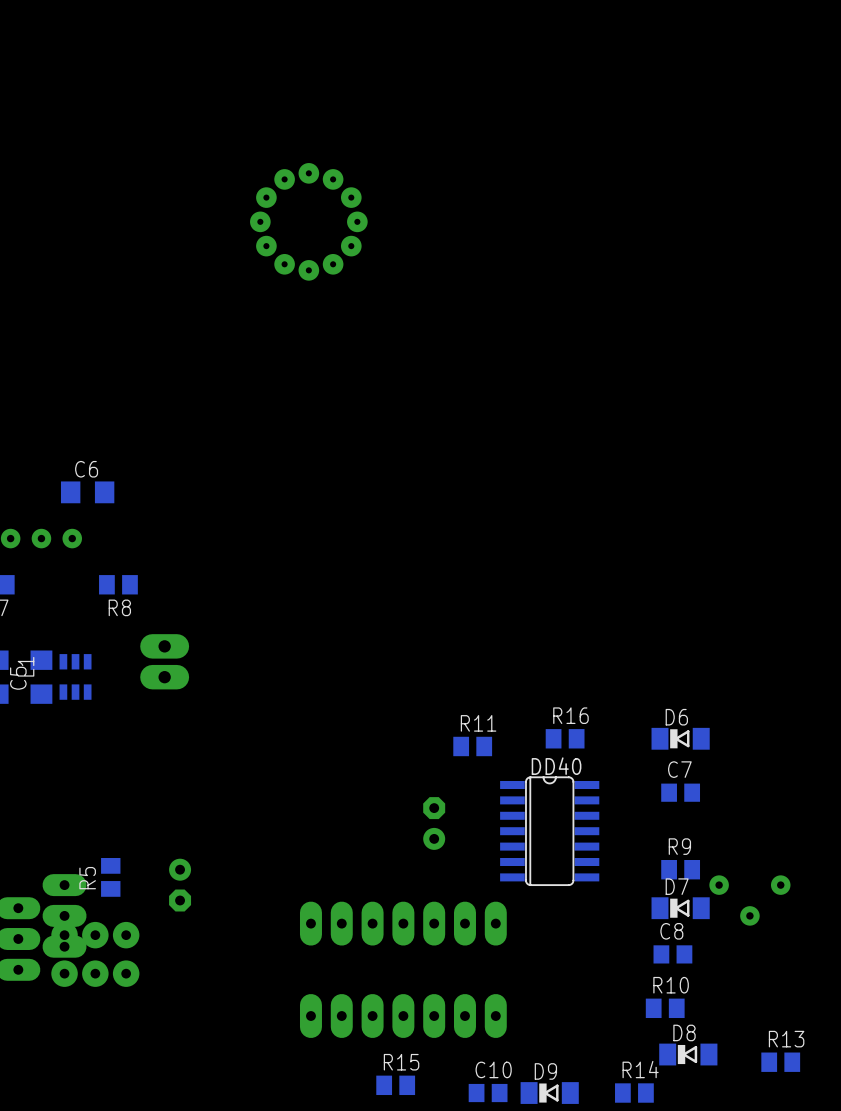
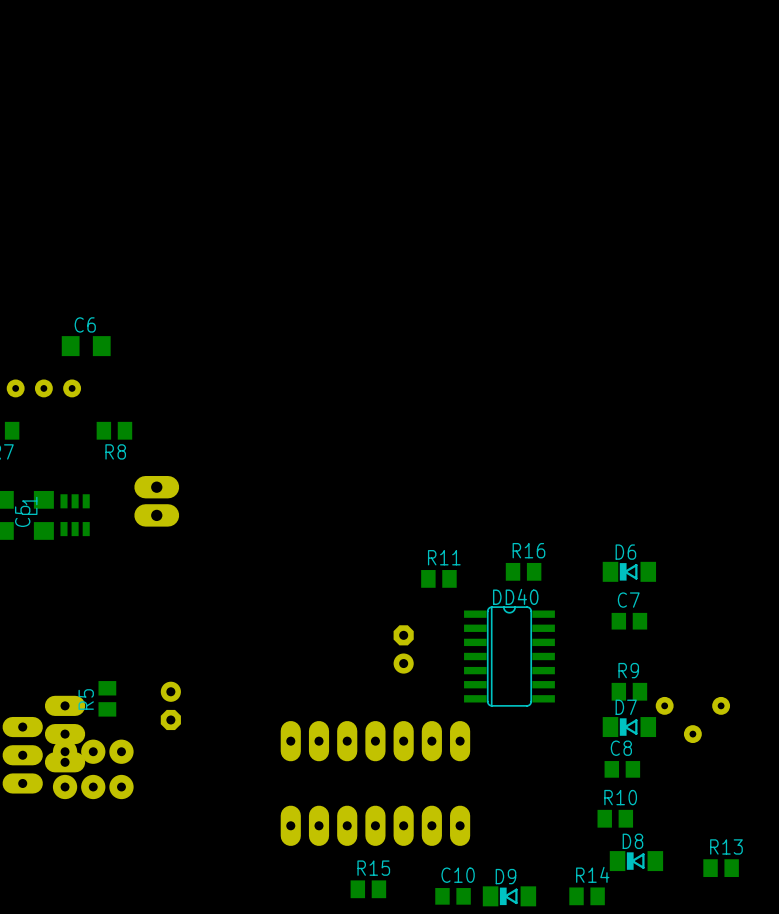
part: (308, 221) -> none

